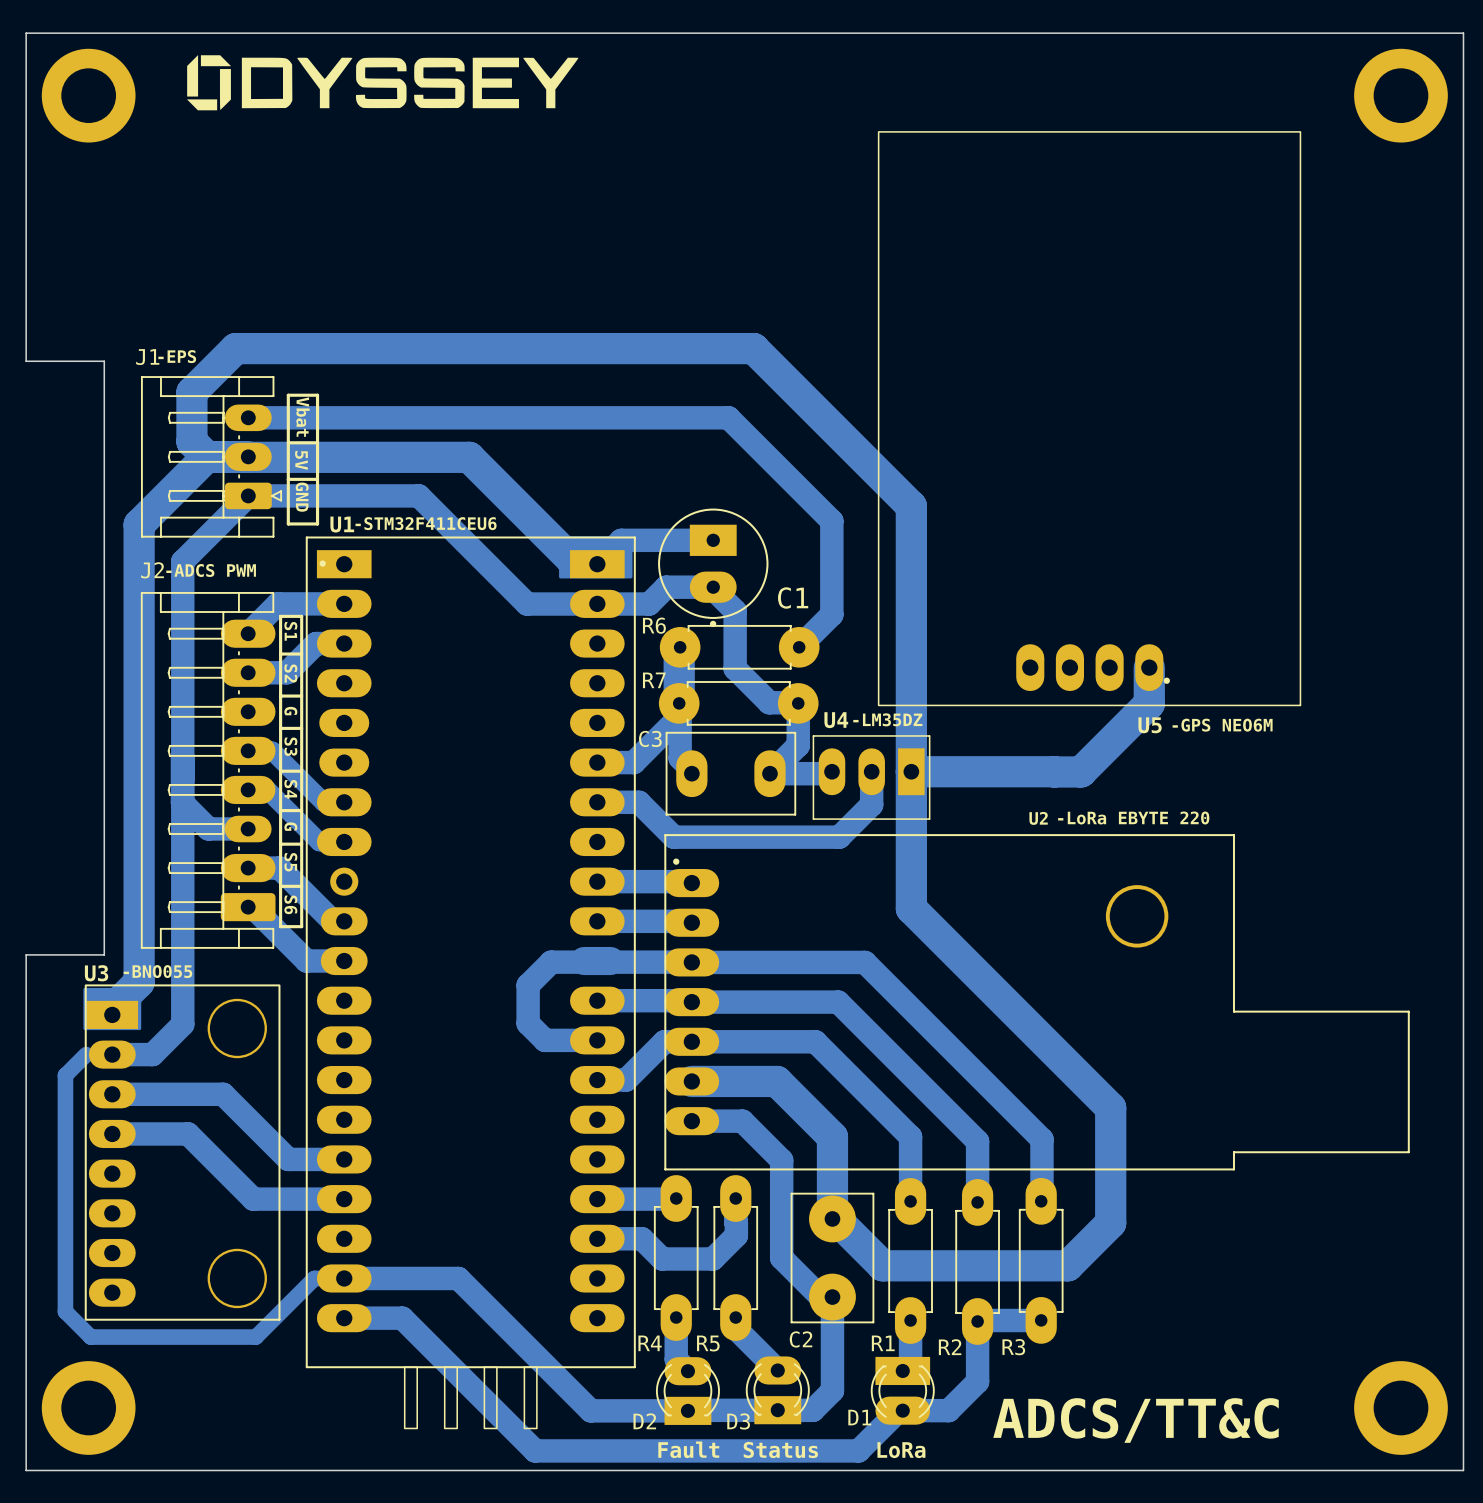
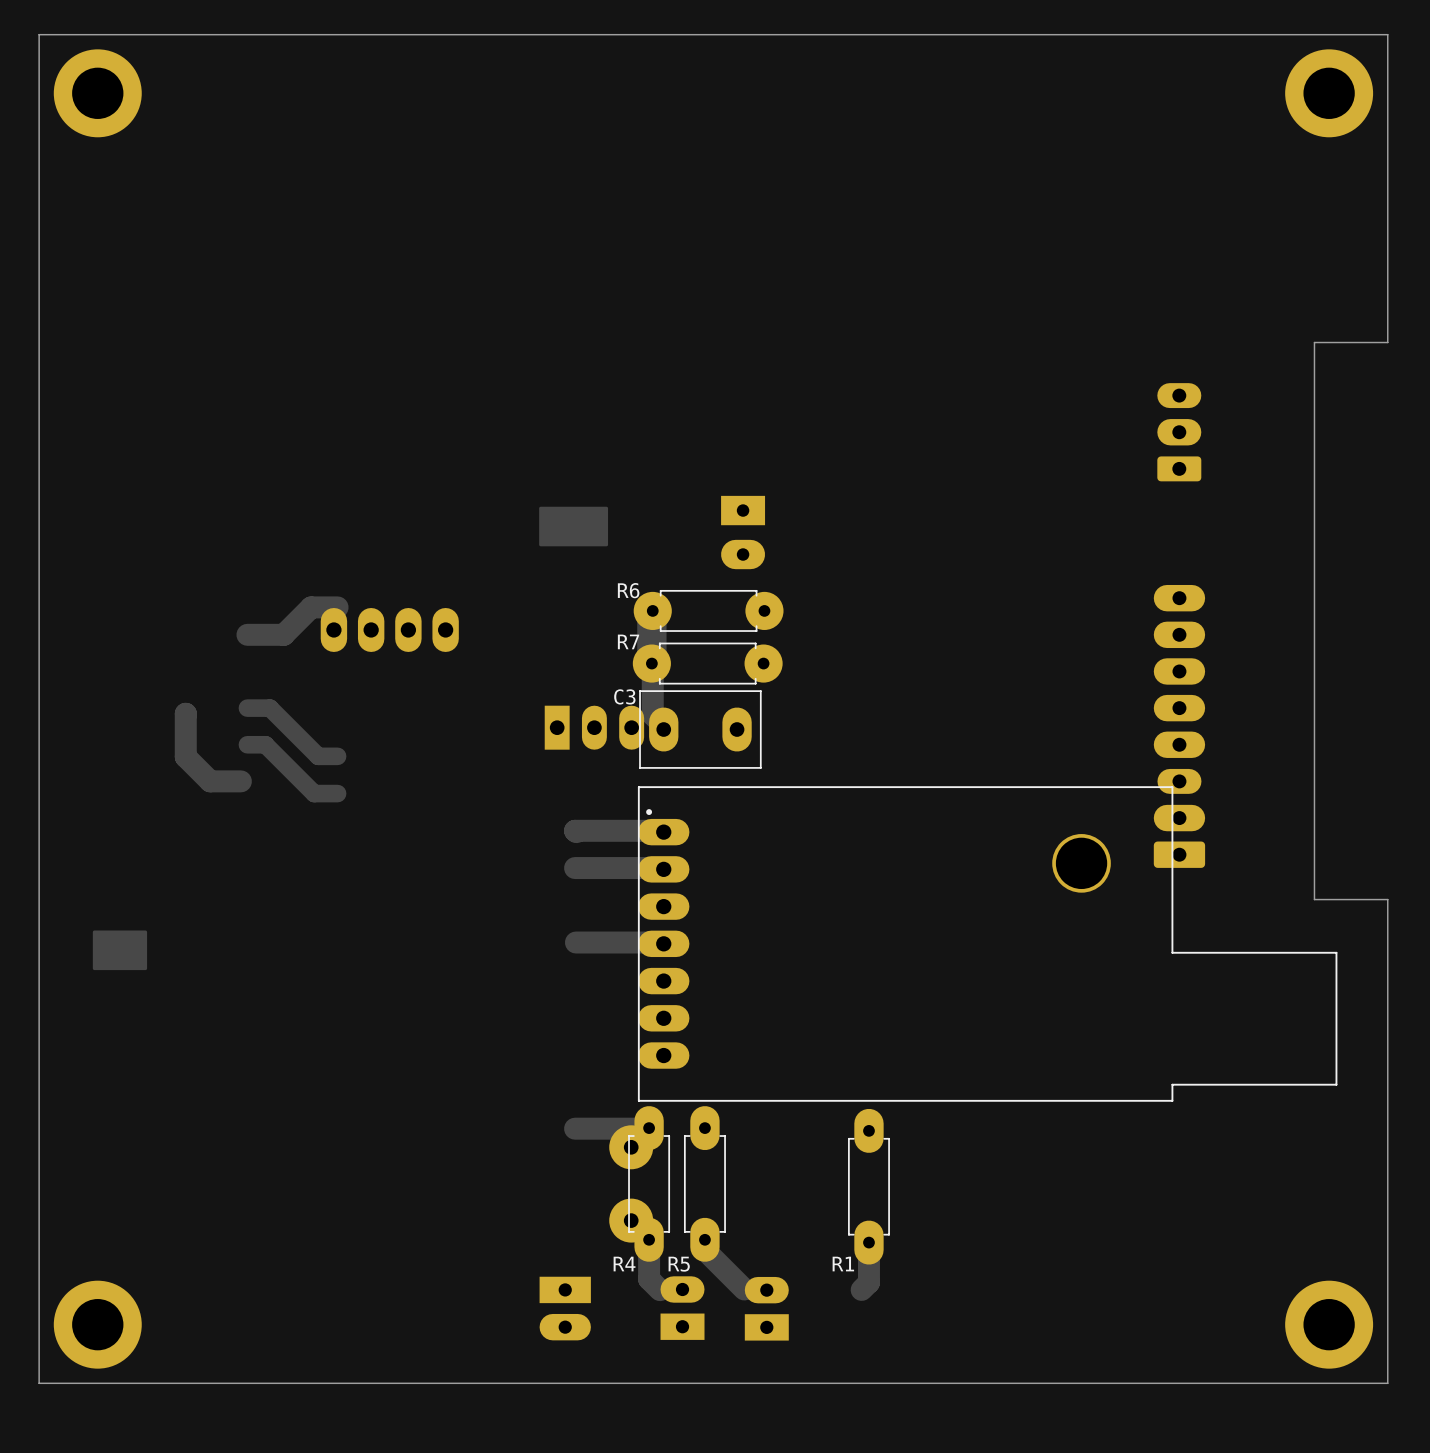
drawing: [186, 55, 579, 111] -> none
text: -EPS (177, 356) -> none
board edge: (26, 361) (104, 361) (104, 954) (26, 954) -> (39, 342) (39, 899)
board edge: (1463, 361) (1463, 954) -> (1387, 342) (1314, 342) (1314, 899) (1387, 899)
line: (317, 395) (288, 395) (288, 523) (317, 523) (317, 395) -> none
track: (248, 417) (728, 417) (831, 521) (831, 614) (799, 647) -> none
text: Vbat (302, 417) -> none
U5: (1089, 418) -> none
line: (317, 442) (288, 442) -> none
J1: (211, 456) -> none
track: (248, 456) (206, 456) (139, 524) (139, 982) (112, 1008) -> none
part: none -> (1179, 432)
text: 5V (301, 460) -> none
line: (317, 479) (288, 479) -> none
track: (247, 495) (418, 495) (527, 604) (649, 604) (666, 587) (711, 587) (735, 610) (735, 668) (769, 702) (798, 703) (798, 745) (769, 773) (830, 773) (832, 771) -> none
track: (248, 495) (182, 561) (182, 1024) (152, 1054) (112, 1054) -> none
text: GND (302, 497) -> none
text: -STM32F411CEU6 (426, 523) -> none
track: (713, 542) (711, 540) (621, 540) (597, 564) -> none
track: (595, 559) (571, 559) (469, 457) (207, 457) (191, 441) (191, 392) (235, 348) (753, 348) (911, 506) (911, 908) (1110, 1107) (1110, 1223) (1067, 1265) (882, 1265) (832, 1215) (832, 1136) (777, 1081) (691, 1081) -> none
C1 side: bottom (713, 567) -> top (743, 532)
text: -ADCS PWM (211, 570) -> none
track: (344, 603) (278, 603) (248, 633) -> none
line: (301, 616) (280, 616) (280, 926) (301, 926) (301, 616) -> none
text: S1 (290, 631) -> none
line: (301, 654) (280, 654) -> none
part: none -> (389, 629)
track: (1149, 667) (1149, 703) (1081, 771) (911, 771) -> none
text: S2 (290, 673) -> none
line: (301, 696) (280, 696) -> none
track: (679, 703) (679, 717) (633, 762) (597, 762) (605, 762) -> none
text: G (290, 711) -> none
text: -LM35DZ (887, 719) -> none
text: -GPS NEO6M (1222, 725) -> none
line: (301, 728) (280, 728) -> none
text: S3 (290, 746) -> none
J2: (208, 770) -> none
part: none -> (1179, 726)
line: (301, 771) (280, 771) -> none
track: (871, 771) (871, 804) (839, 837) (673, 837) (639, 802) (597, 802) -> none
U4 side: bottom (871, 777) -> top (594, 727)
text: S4 (290, 789) -> none
line: (301, 810) (280, 810) -> none
text: -LoRa EBYTE 220 (1133, 817) -> none
text: U2 (1038, 818) -> none
text: G (290, 826) -> none
line: (301, 844) (280, 844) -> none
text: S5 (290, 862) -> none
track: (248, 868) (279, 868) (332, 921) (344, 921) -> none
line: (301, 886) (280, 886) -> none
text: S6 (290, 904) -> none
track: (248, 907) (252, 907) (306, 961) (344, 961) -> none
text: -BNO055 (157, 971) -> none
U1: (470, 982) -> none
track: (691, 1002) (838, 1002) (977, 1141) (977, 1202) -> none
track: (597, 1040) (545, 1040) (528, 1023) (528, 985) (551, 962) (864, 962) (1041, 1139) (1041, 1201) -> none
track: (86, 1054) (65, 1075) (65, 1311) (90, 1337) (255, 1337) (314, 1278) (337, 1278) -> none
track: (597, 1080) (626, 1080) (664, 1041) (815, 1041) (910, 1136) (910, 1201) -> none
track: (112, 1094) (223, 1094) (288, 1159) (344, 1159) -> none
track: (691, 1121) (742, 1121) (781, 1160) (781, 1258) (820, 1297) (832, 1297) (832, 1390) (812, 1410) (688, 1410) -> none
track: (112, 1133) (188, 1133) (253, 1199) (344, 1199) -> none
U3: (182, 1152) -> none
track: (735, 1198) (736, 1235) (712, 1258) (662, 1258) (641, 1238) (597, 1238) -> none
C2 side: bottom (832, 1258) -> top (631, 1183)
R3: (1041, 1260) -> none
R2: (977, 1261) -> none
track: (344, 1278) (458, 1278) (590, 1410) (689, 1410) -> none
track: (344, 1318) (402, 1318) (535, 1450) (858, 1450) (898, 1410) (948, 1410) (977, 1381) (978, 1320) (1041, 1320) -> none
D3 side: bottom (777, 1390) -> top (682, 1308)
D1 side: bottom (902, 1390) -> top (565, 1308)
D2 side: bottom (687, 1391) -> top (766, 1308)
text: ADCS/TT&C (1136, 1420) -> none
text: Fault (688, 1449) -> none
text: Status (780, 1449) -> none
text: LoRa (901, 1450) -> none

